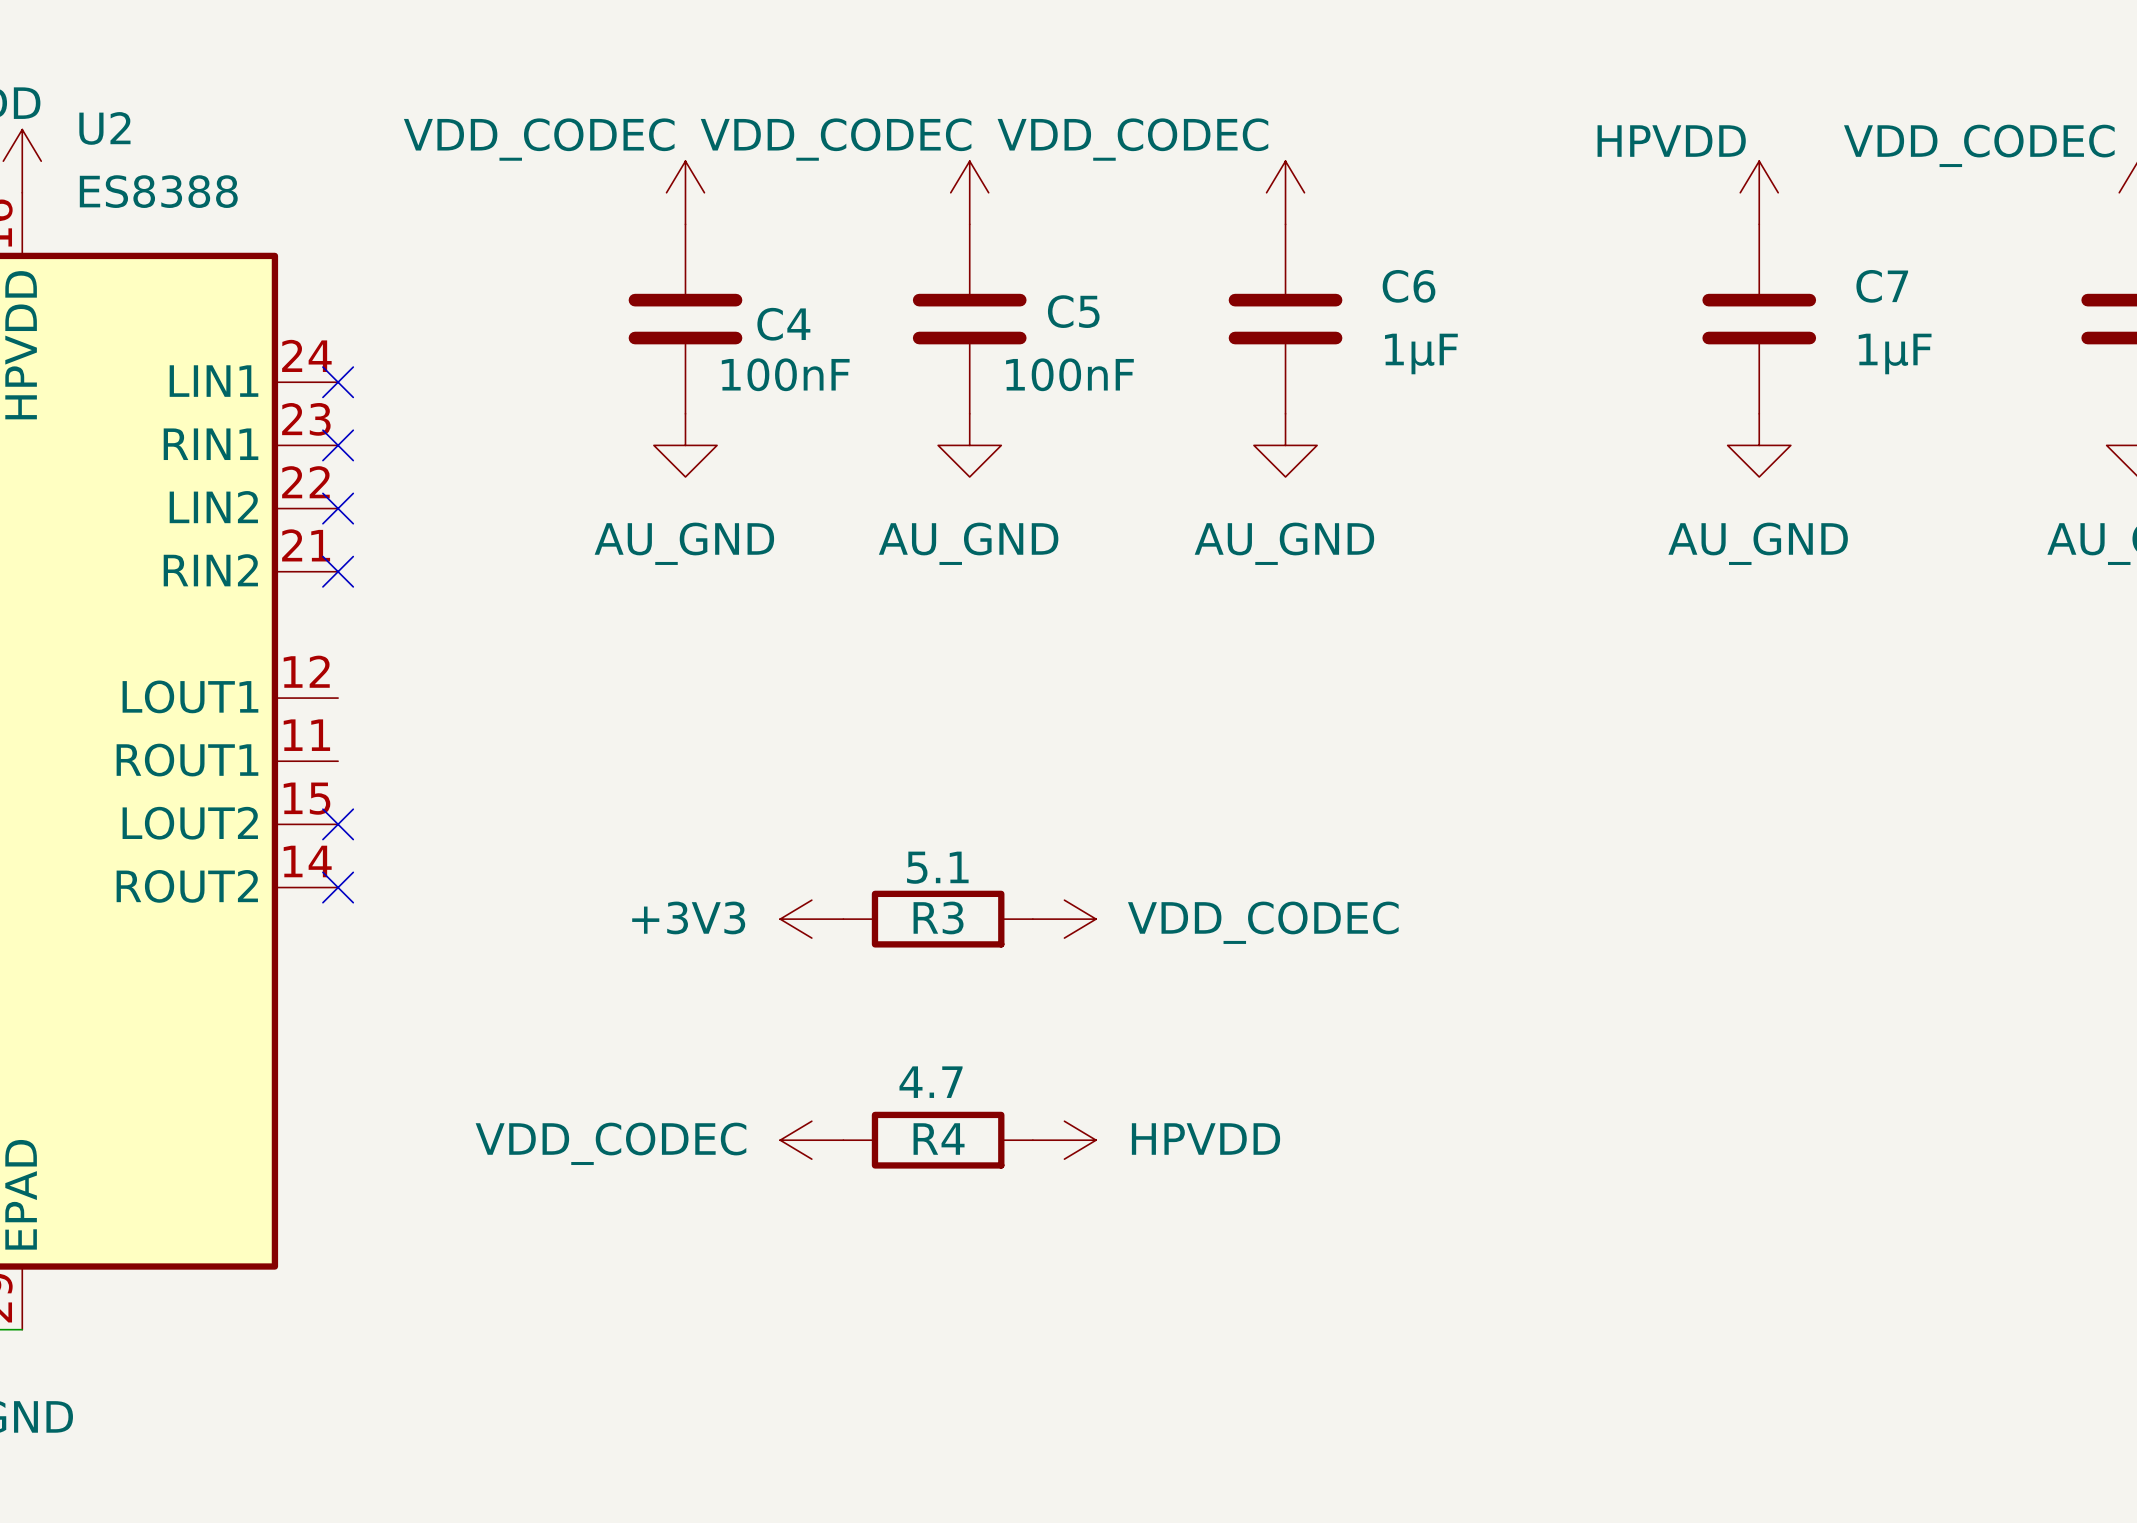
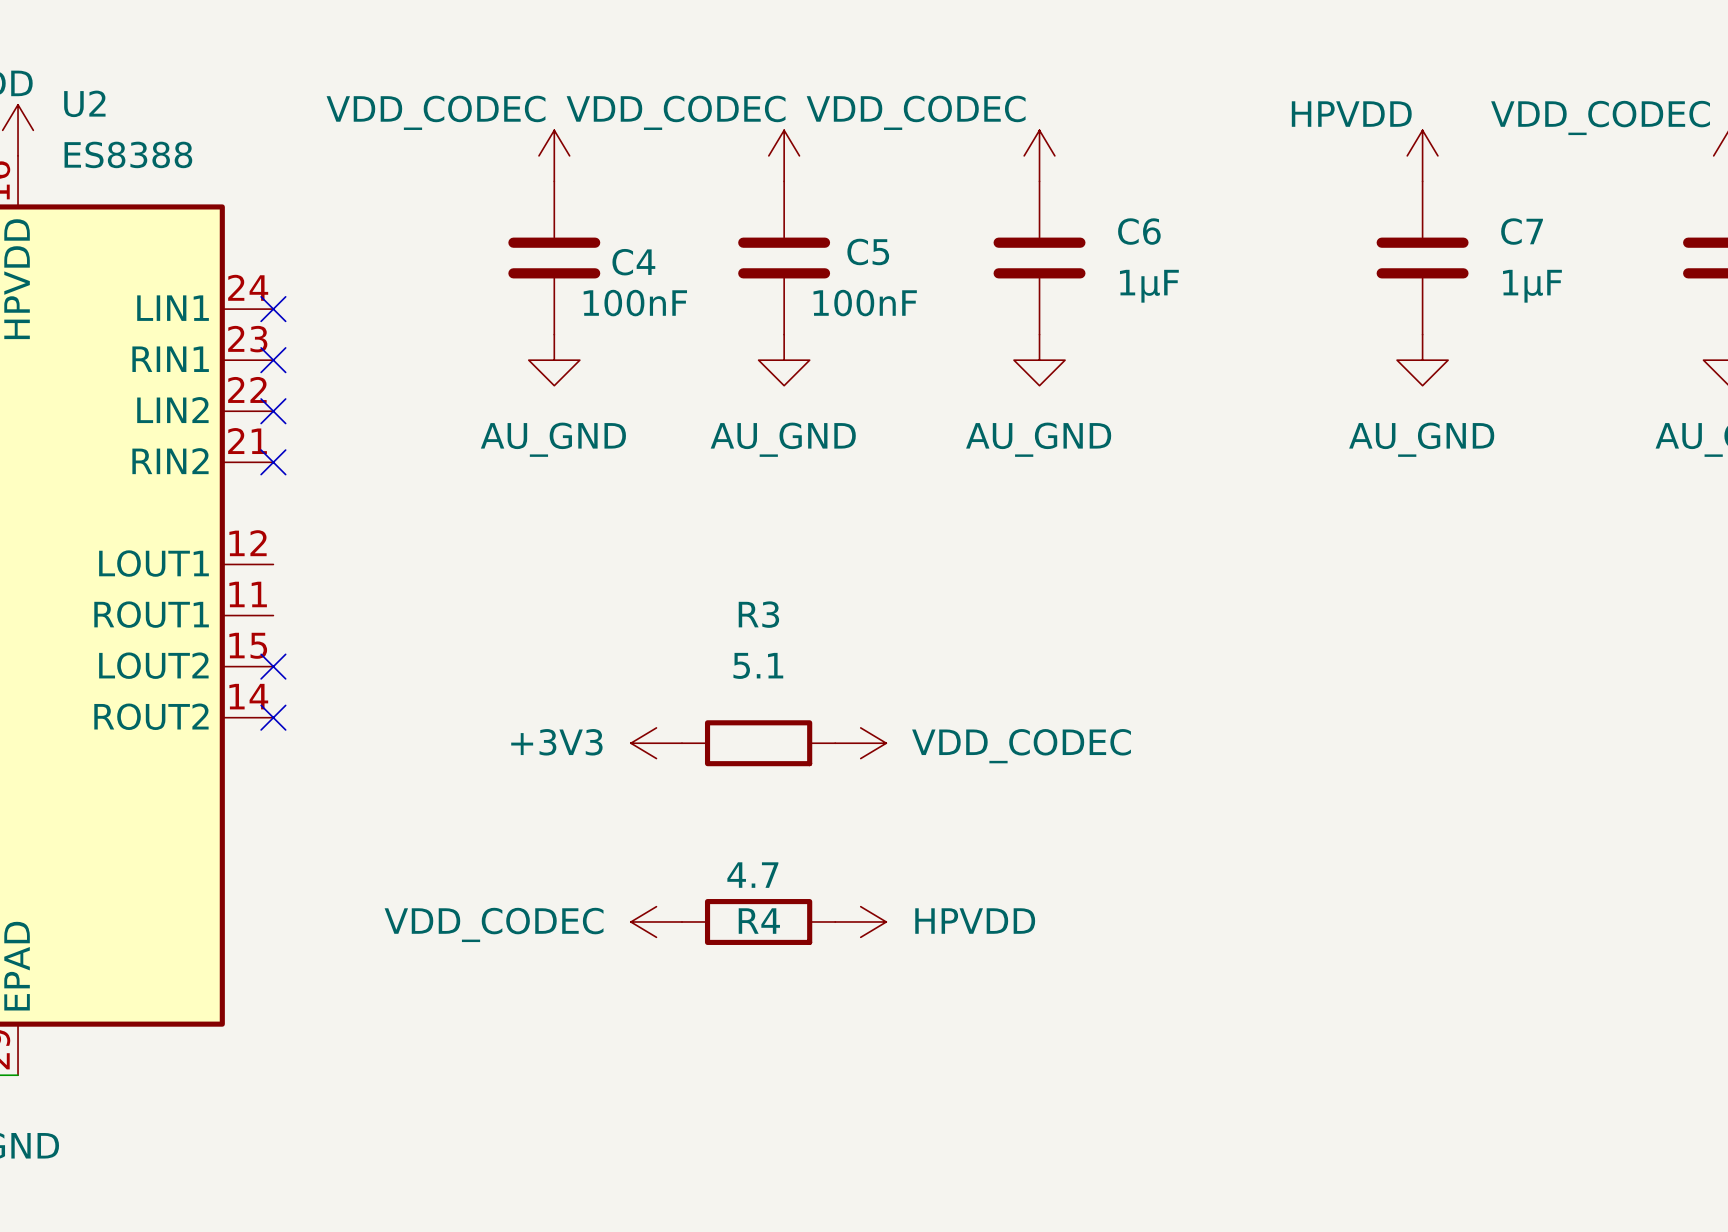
R3 value position: 5.1 (937, 867) -> 5.1 (758, 665)
R3 name position: R3 (938, 917) -> R3 (758, 614)

